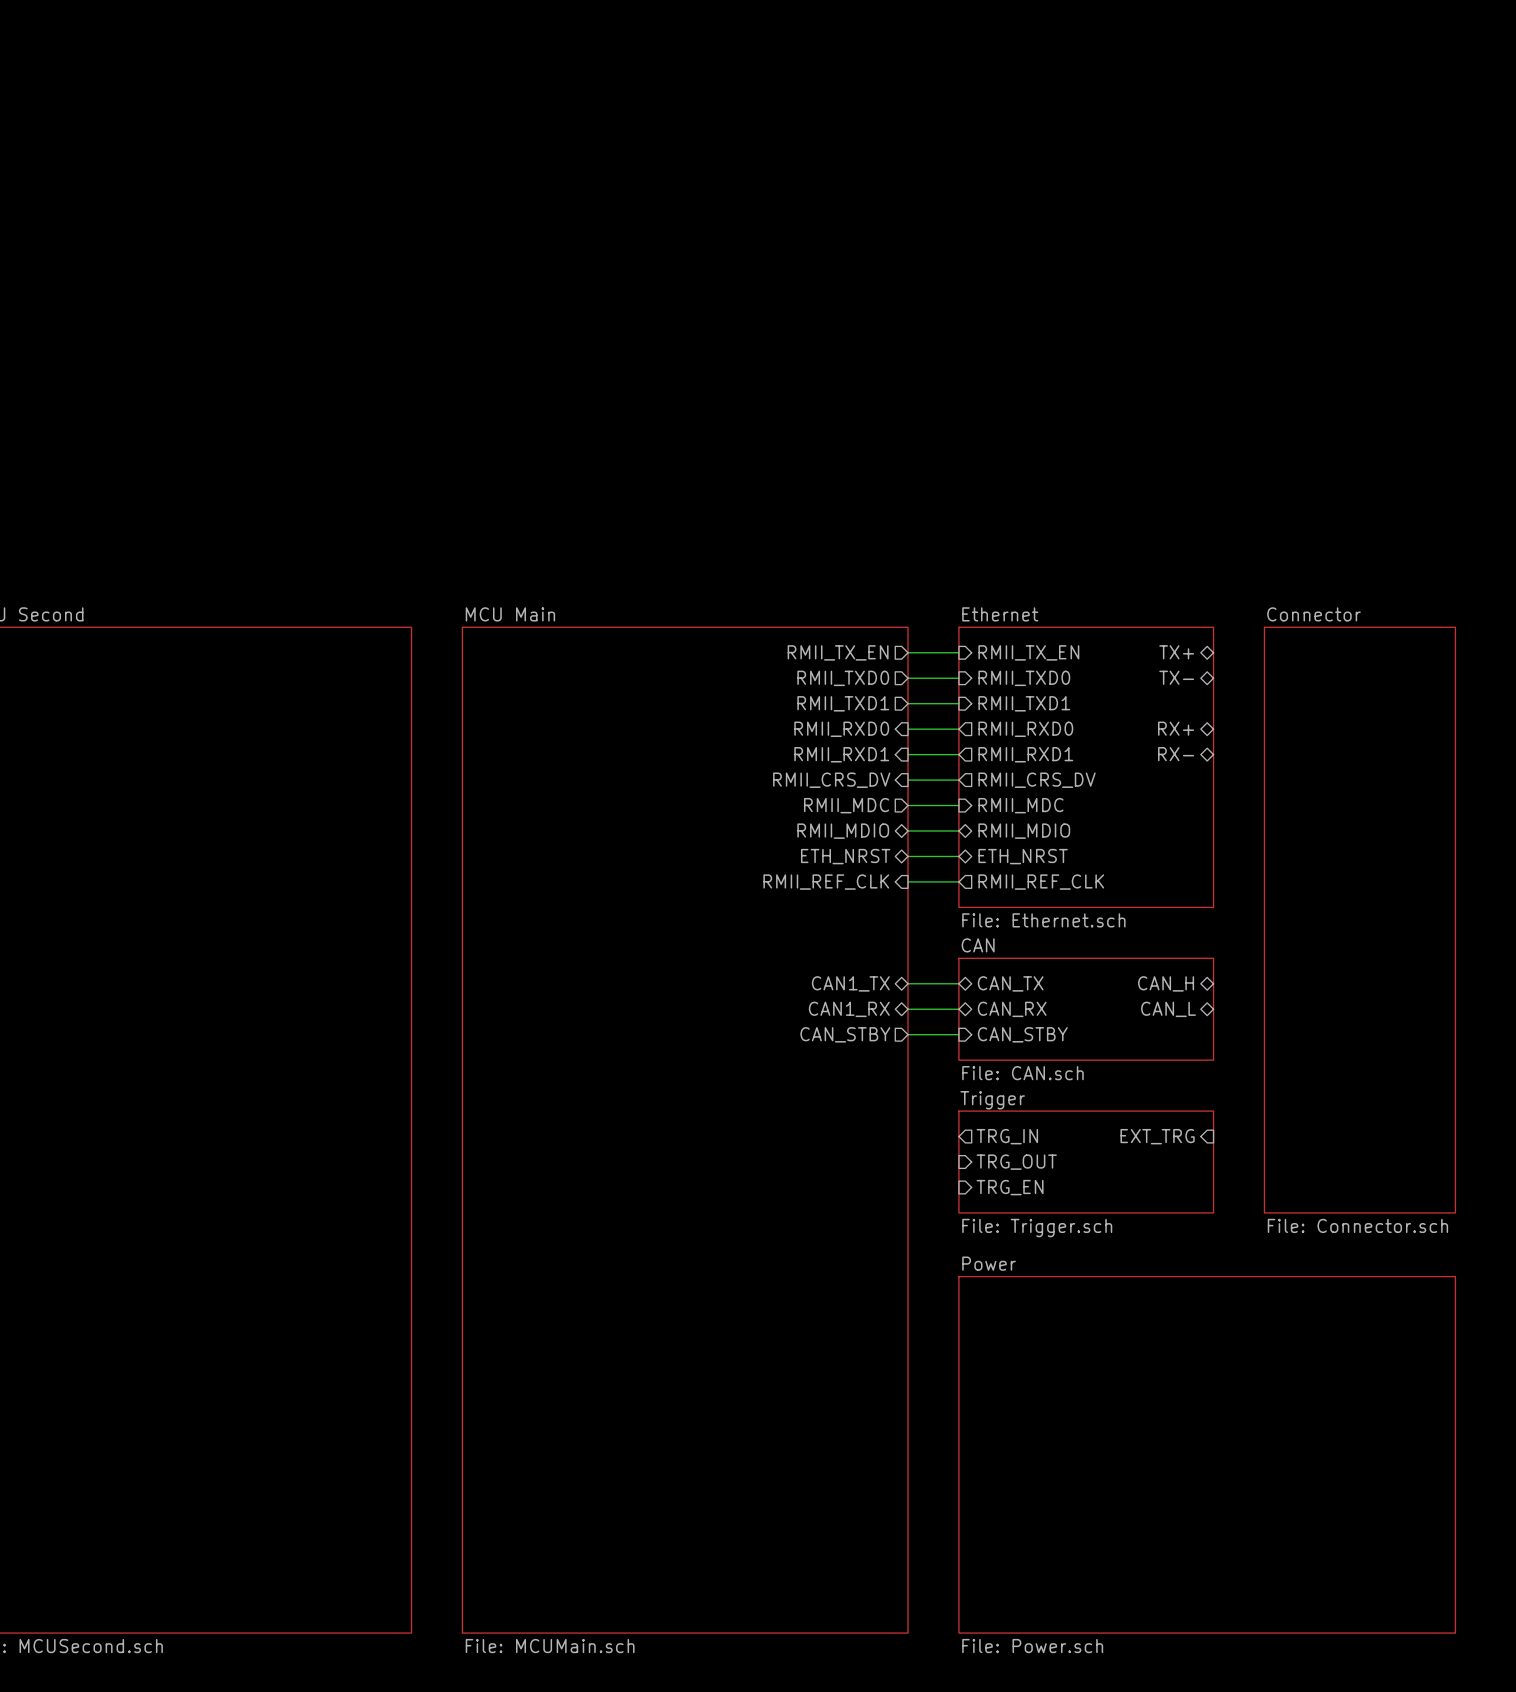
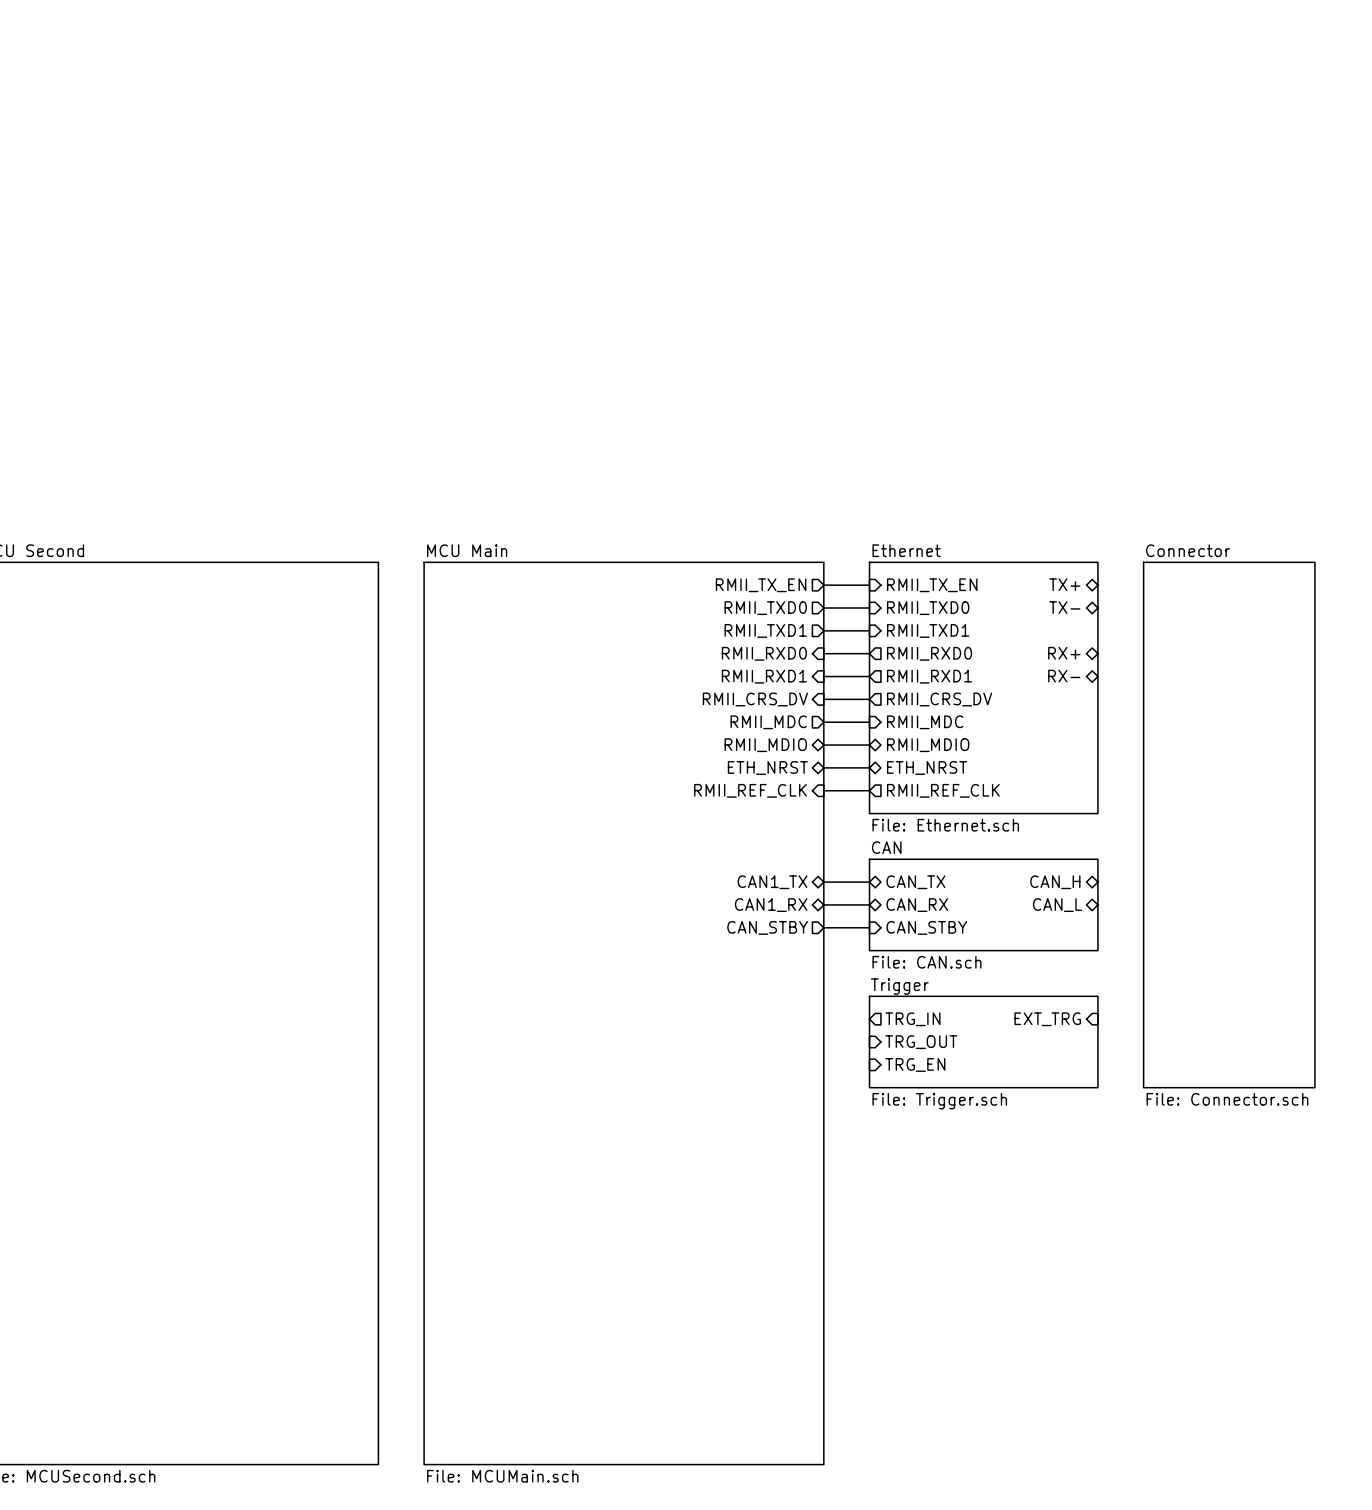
sheet Power: File: Power.sch (1207, 1454) -> none

